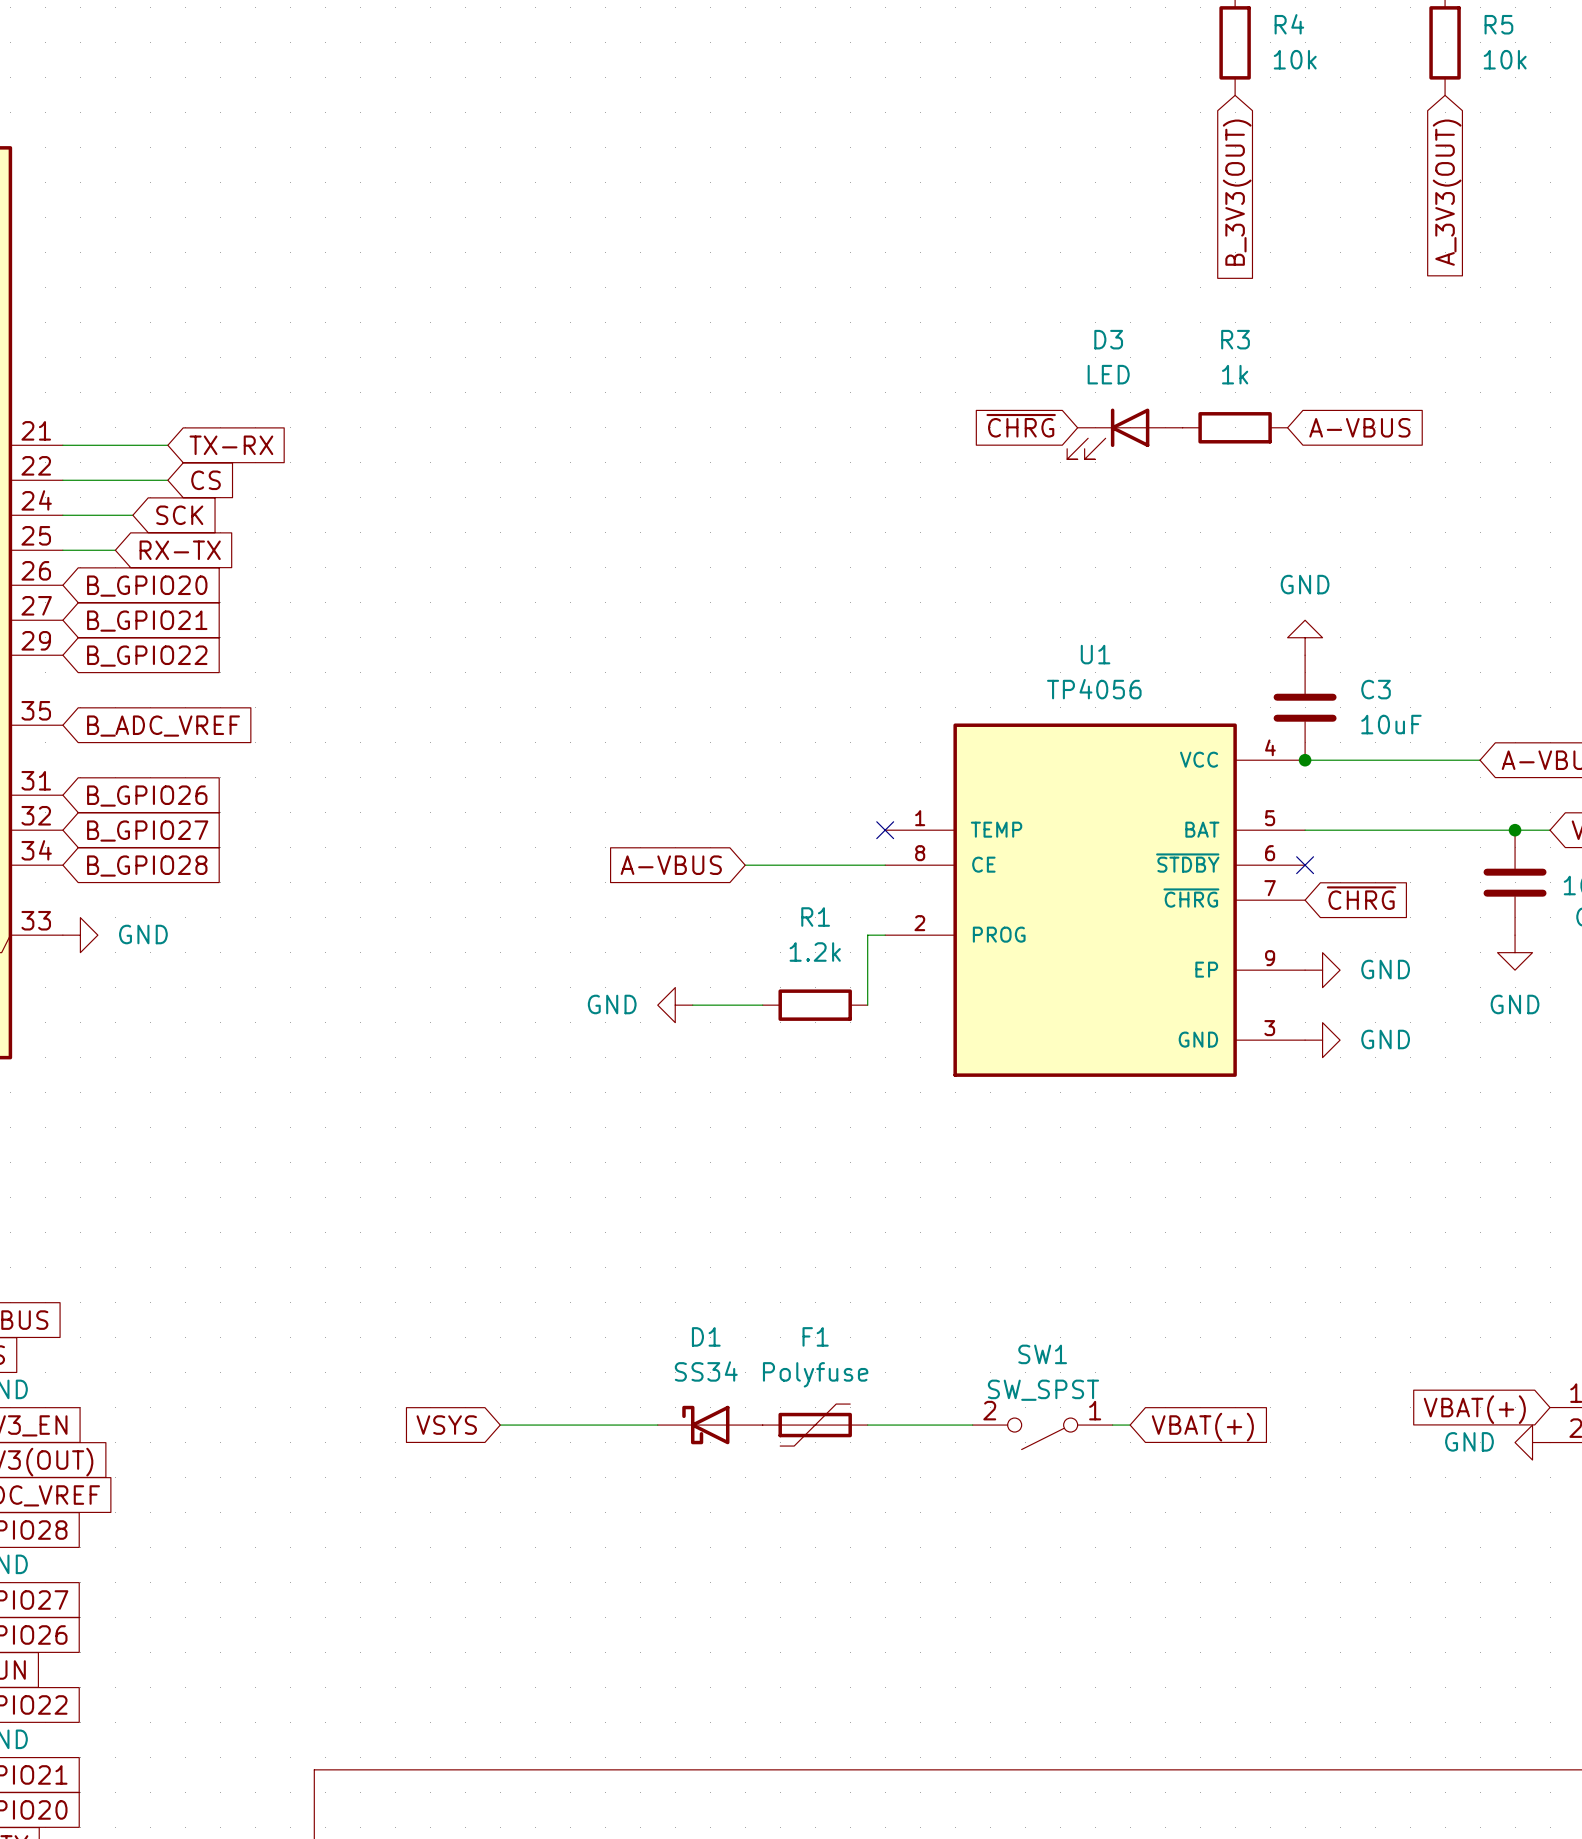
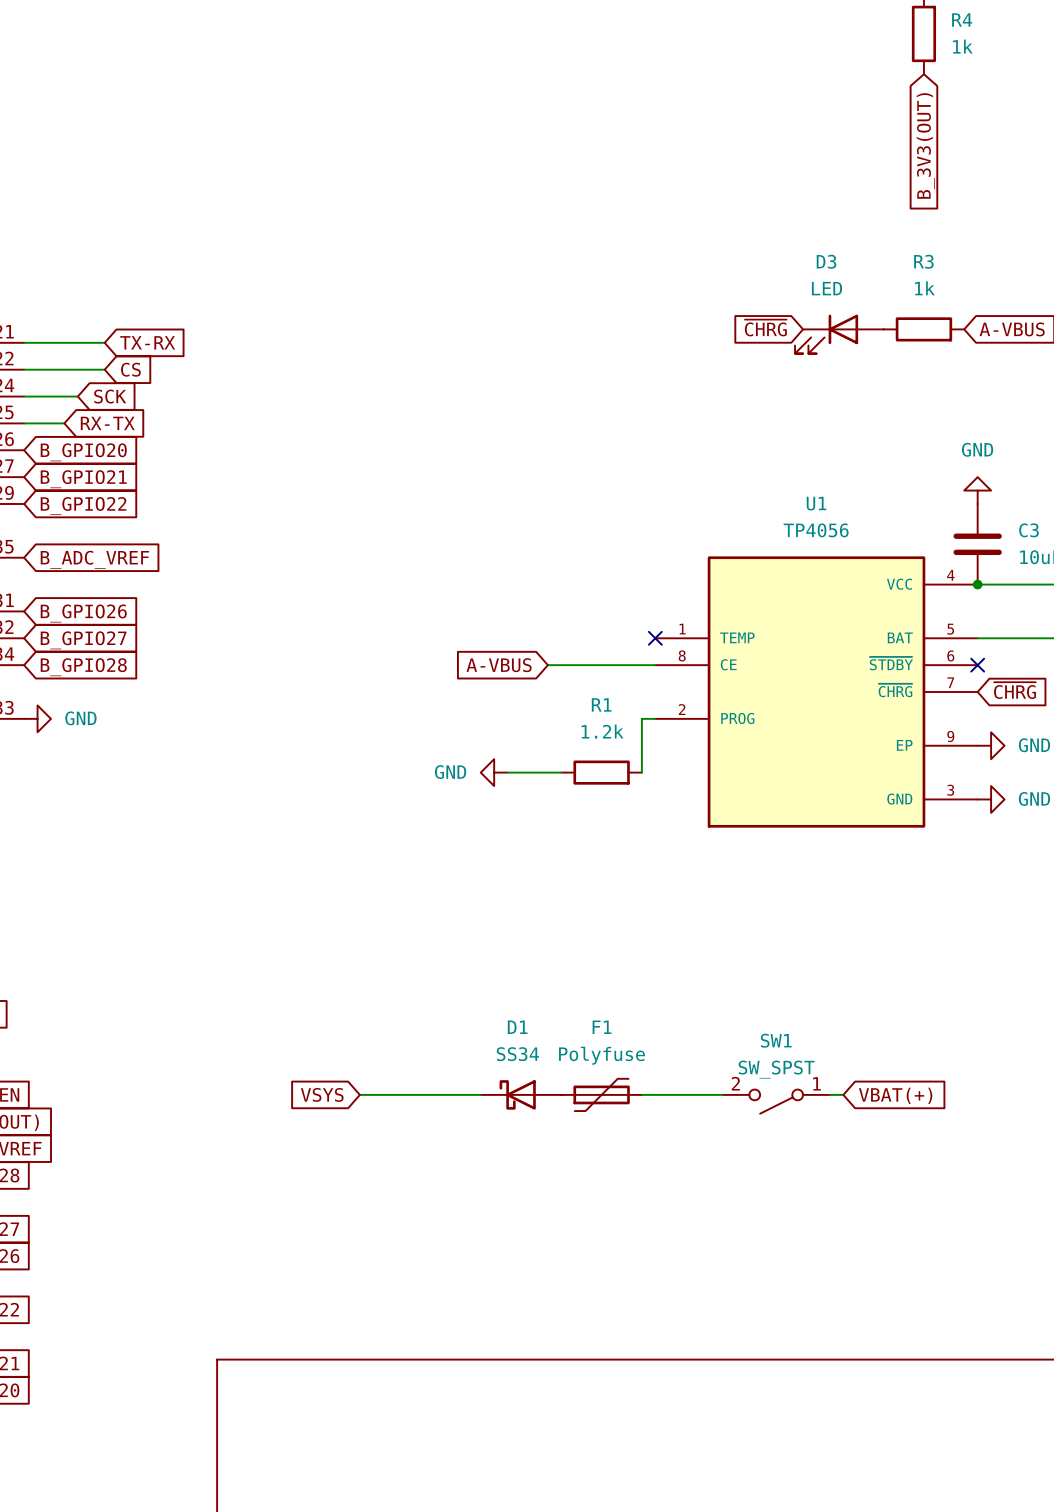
R4 value: 10k (1295, 59) -> 1k (962, 46)

